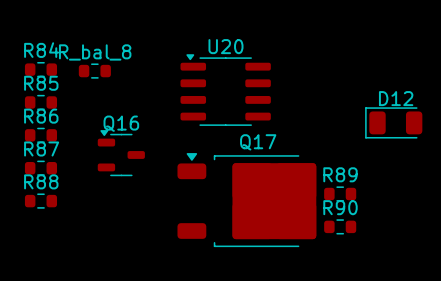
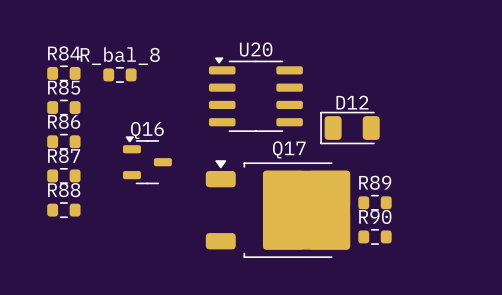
D12 position: (393, 122) -> (349, 128)

